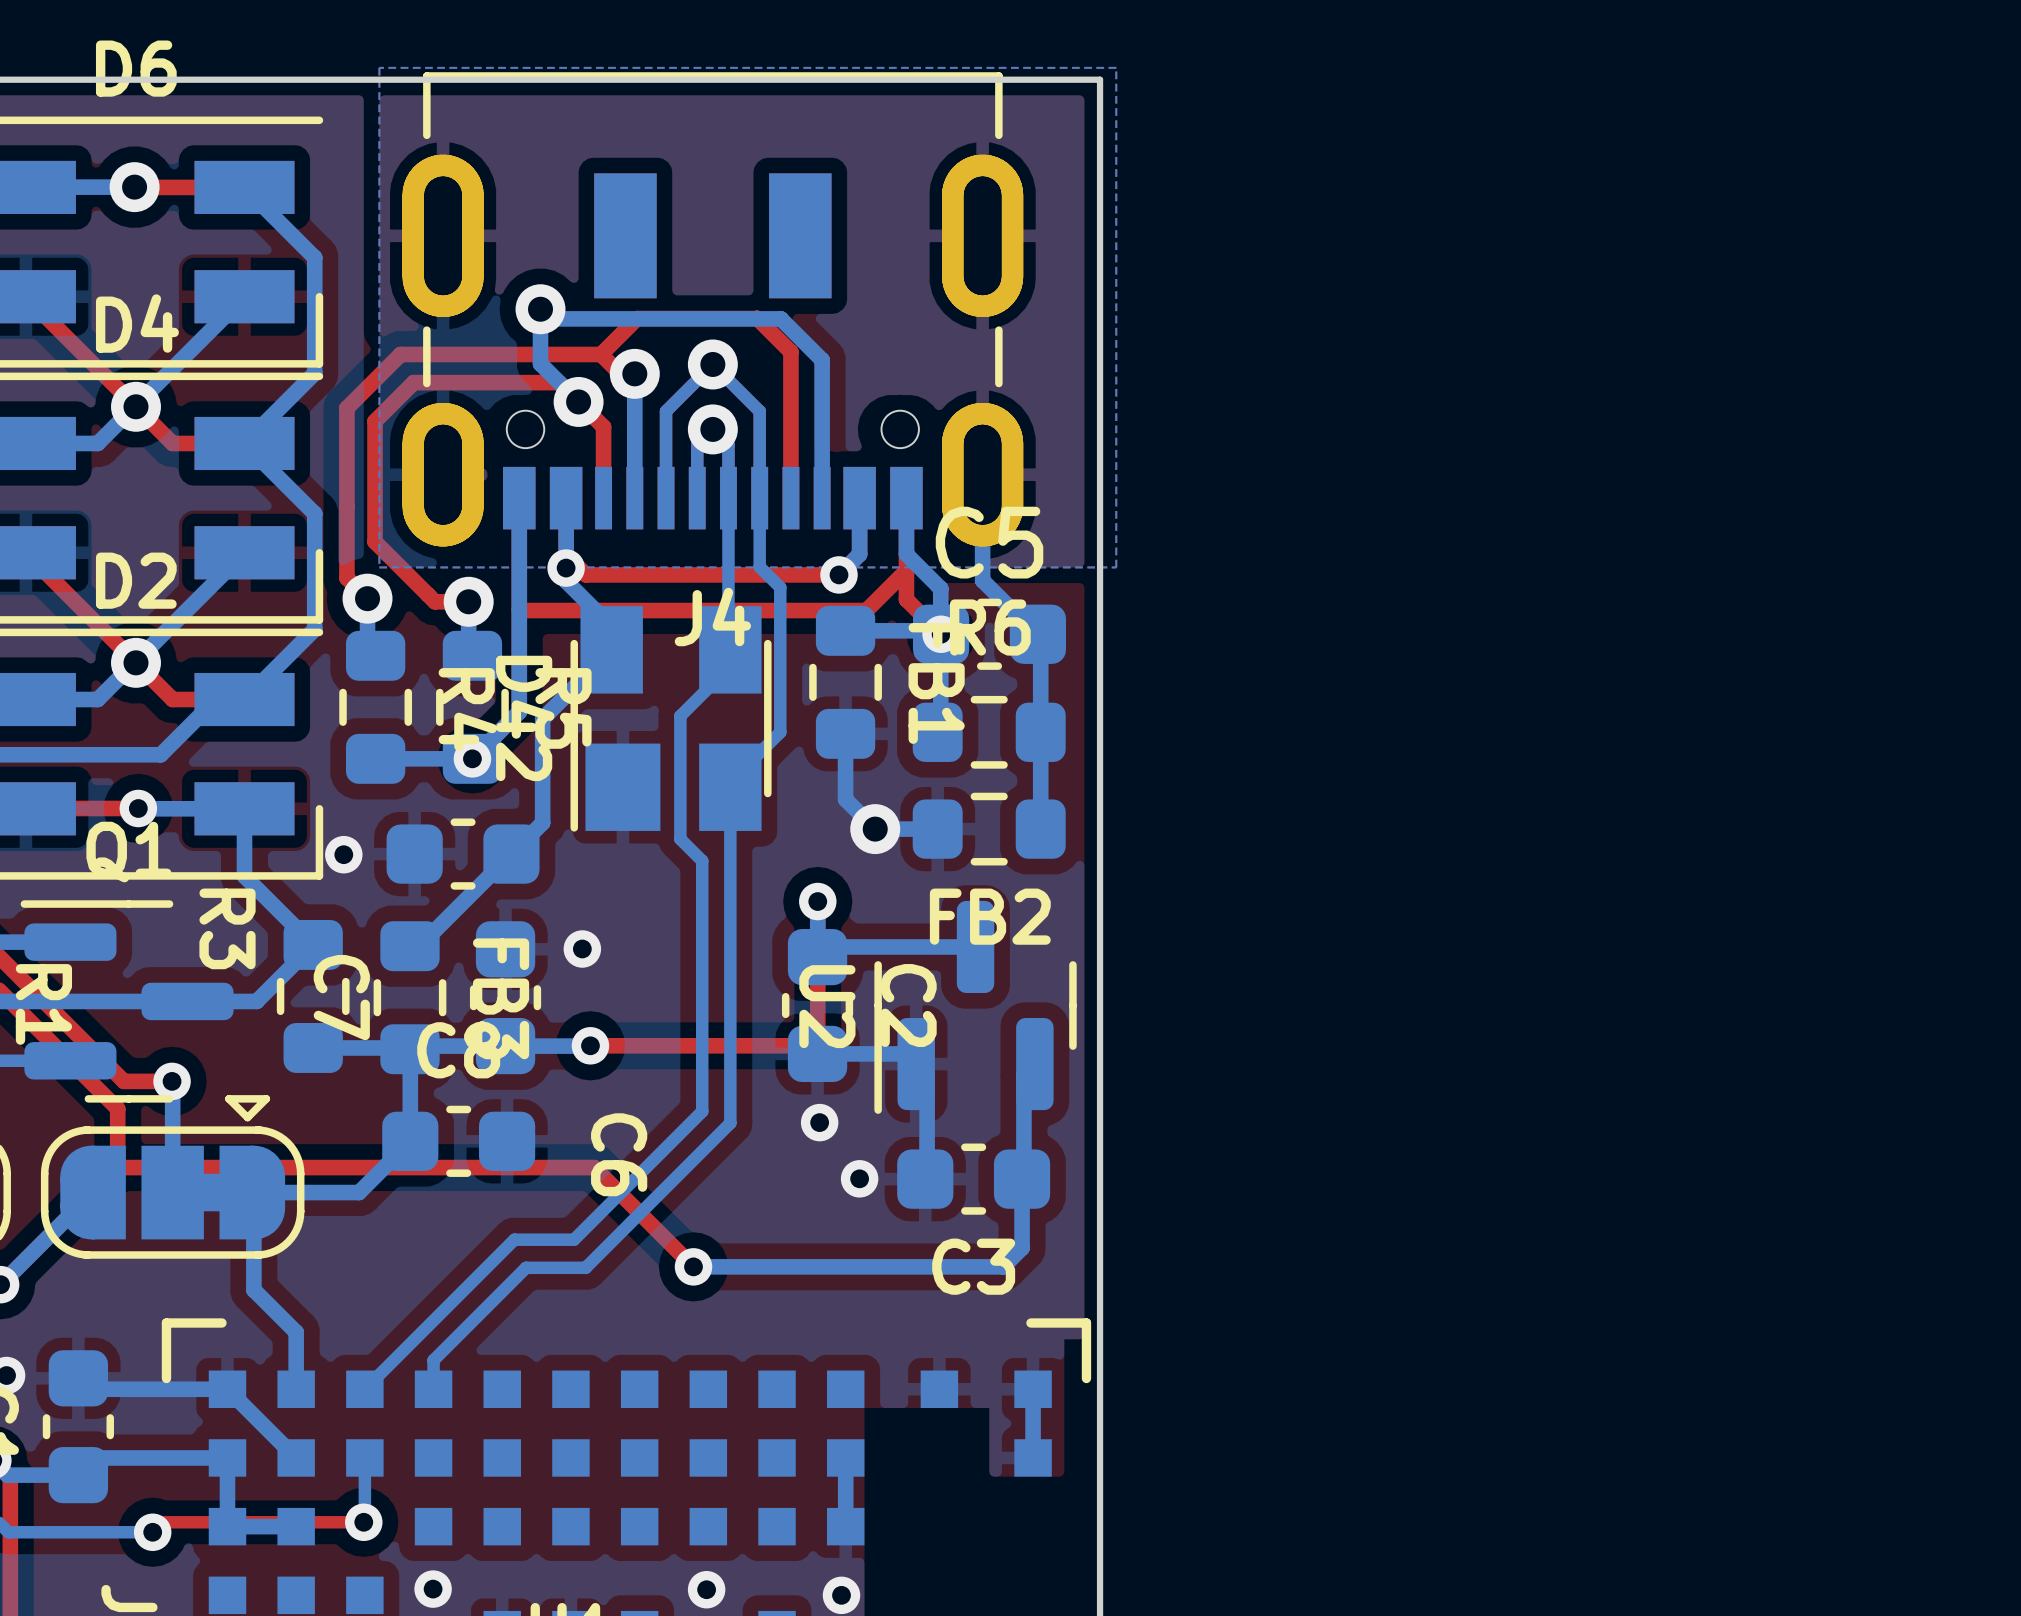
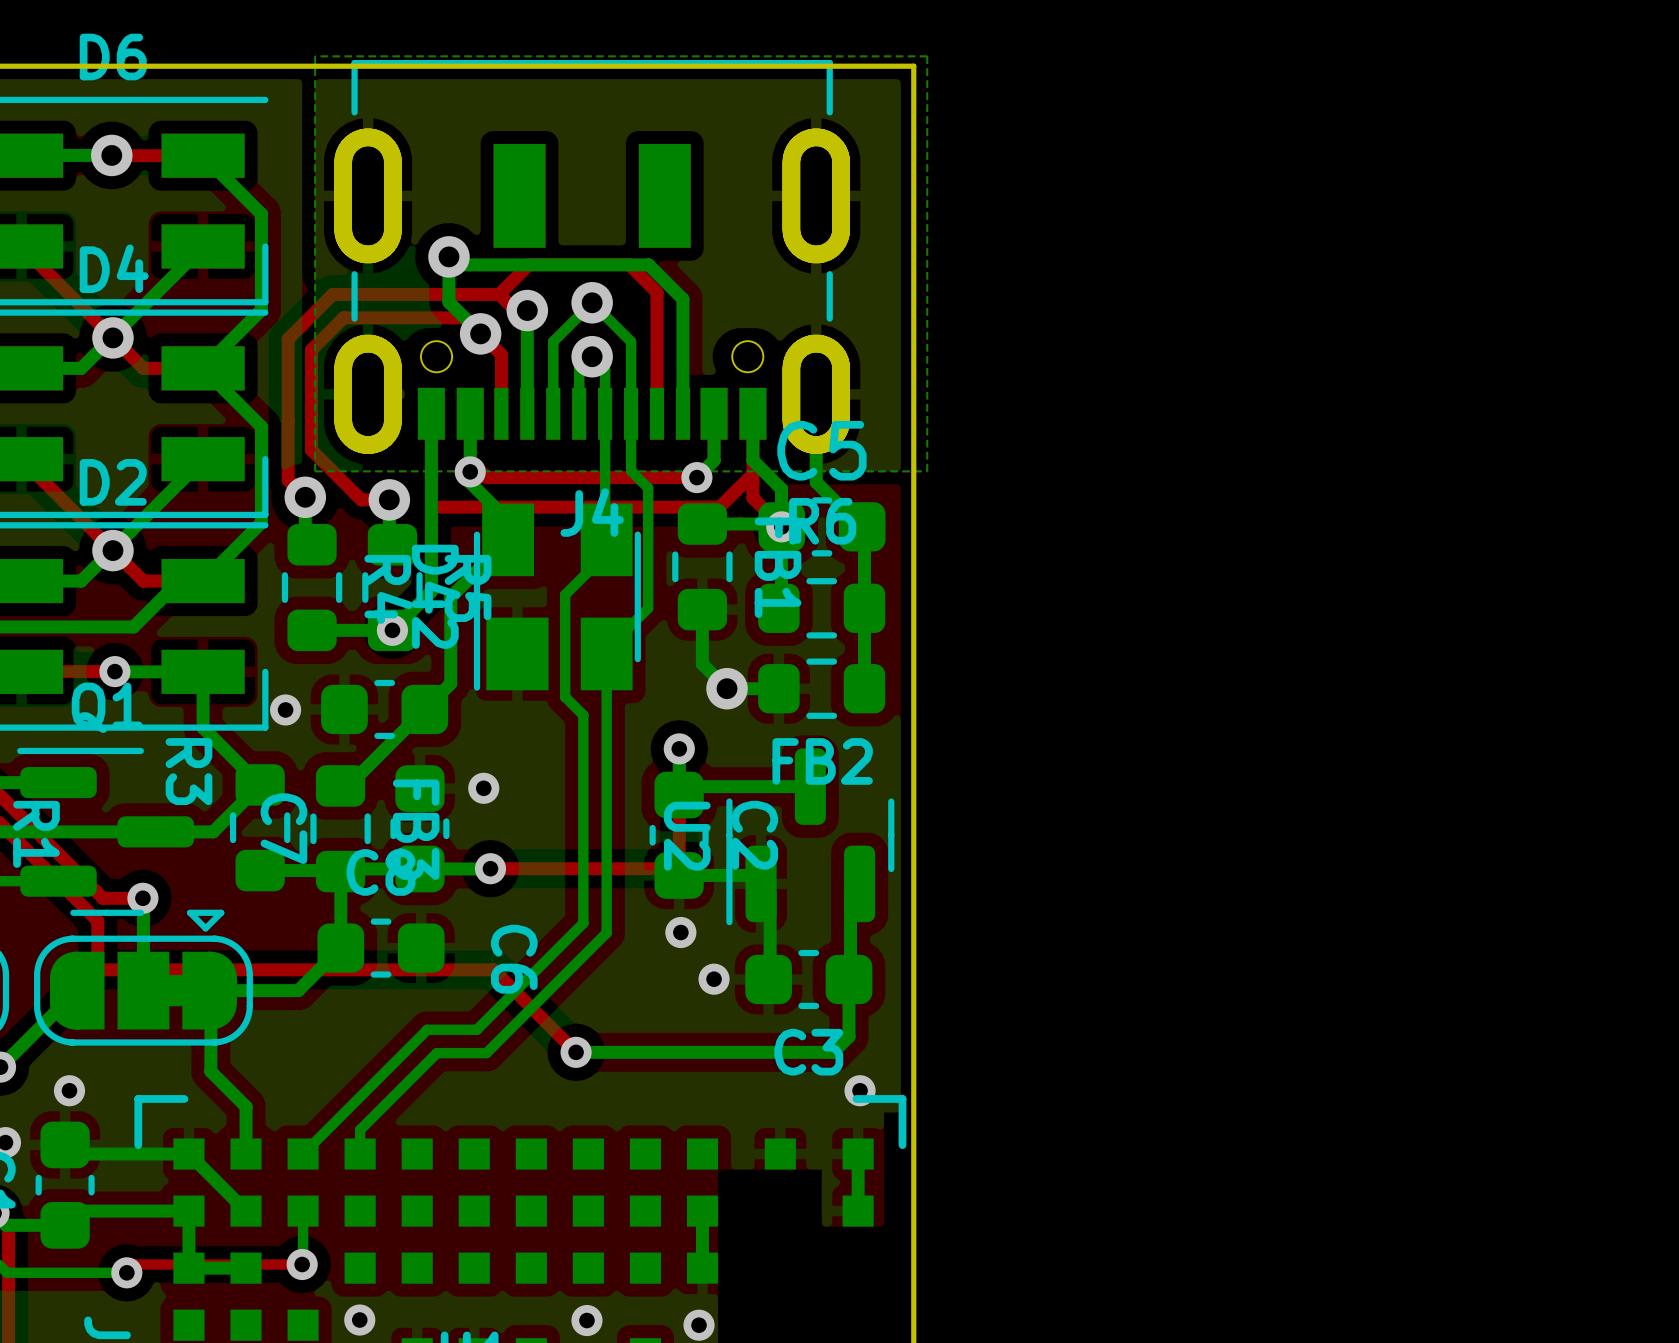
via: none -> (69, 1090)
via: none -> (860, 1090)

